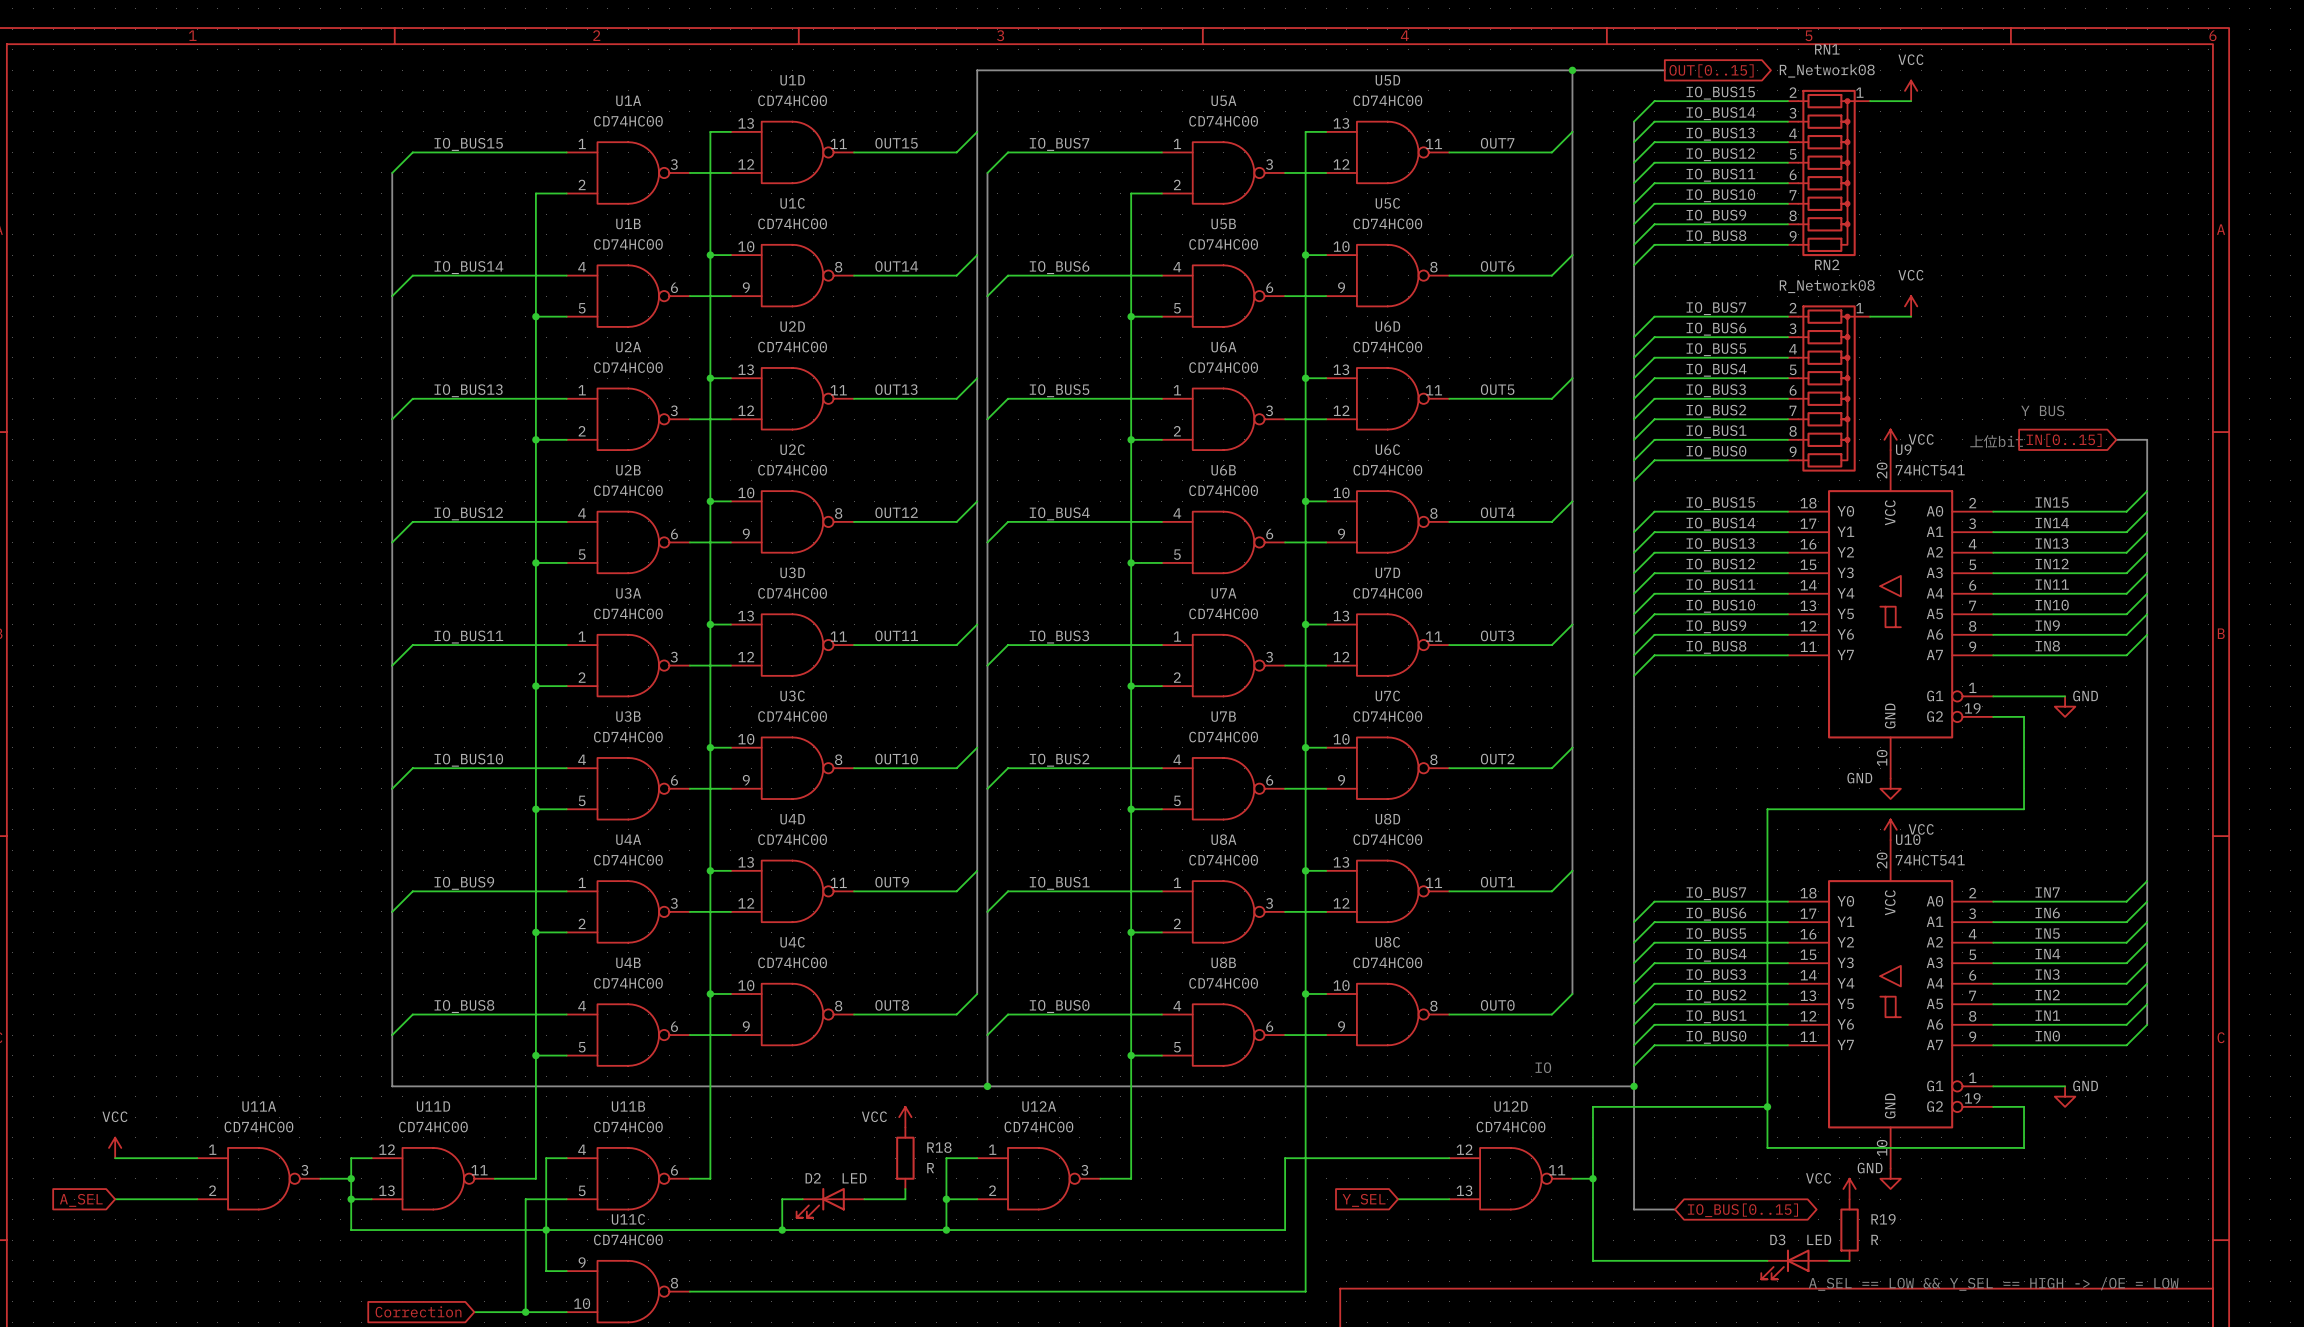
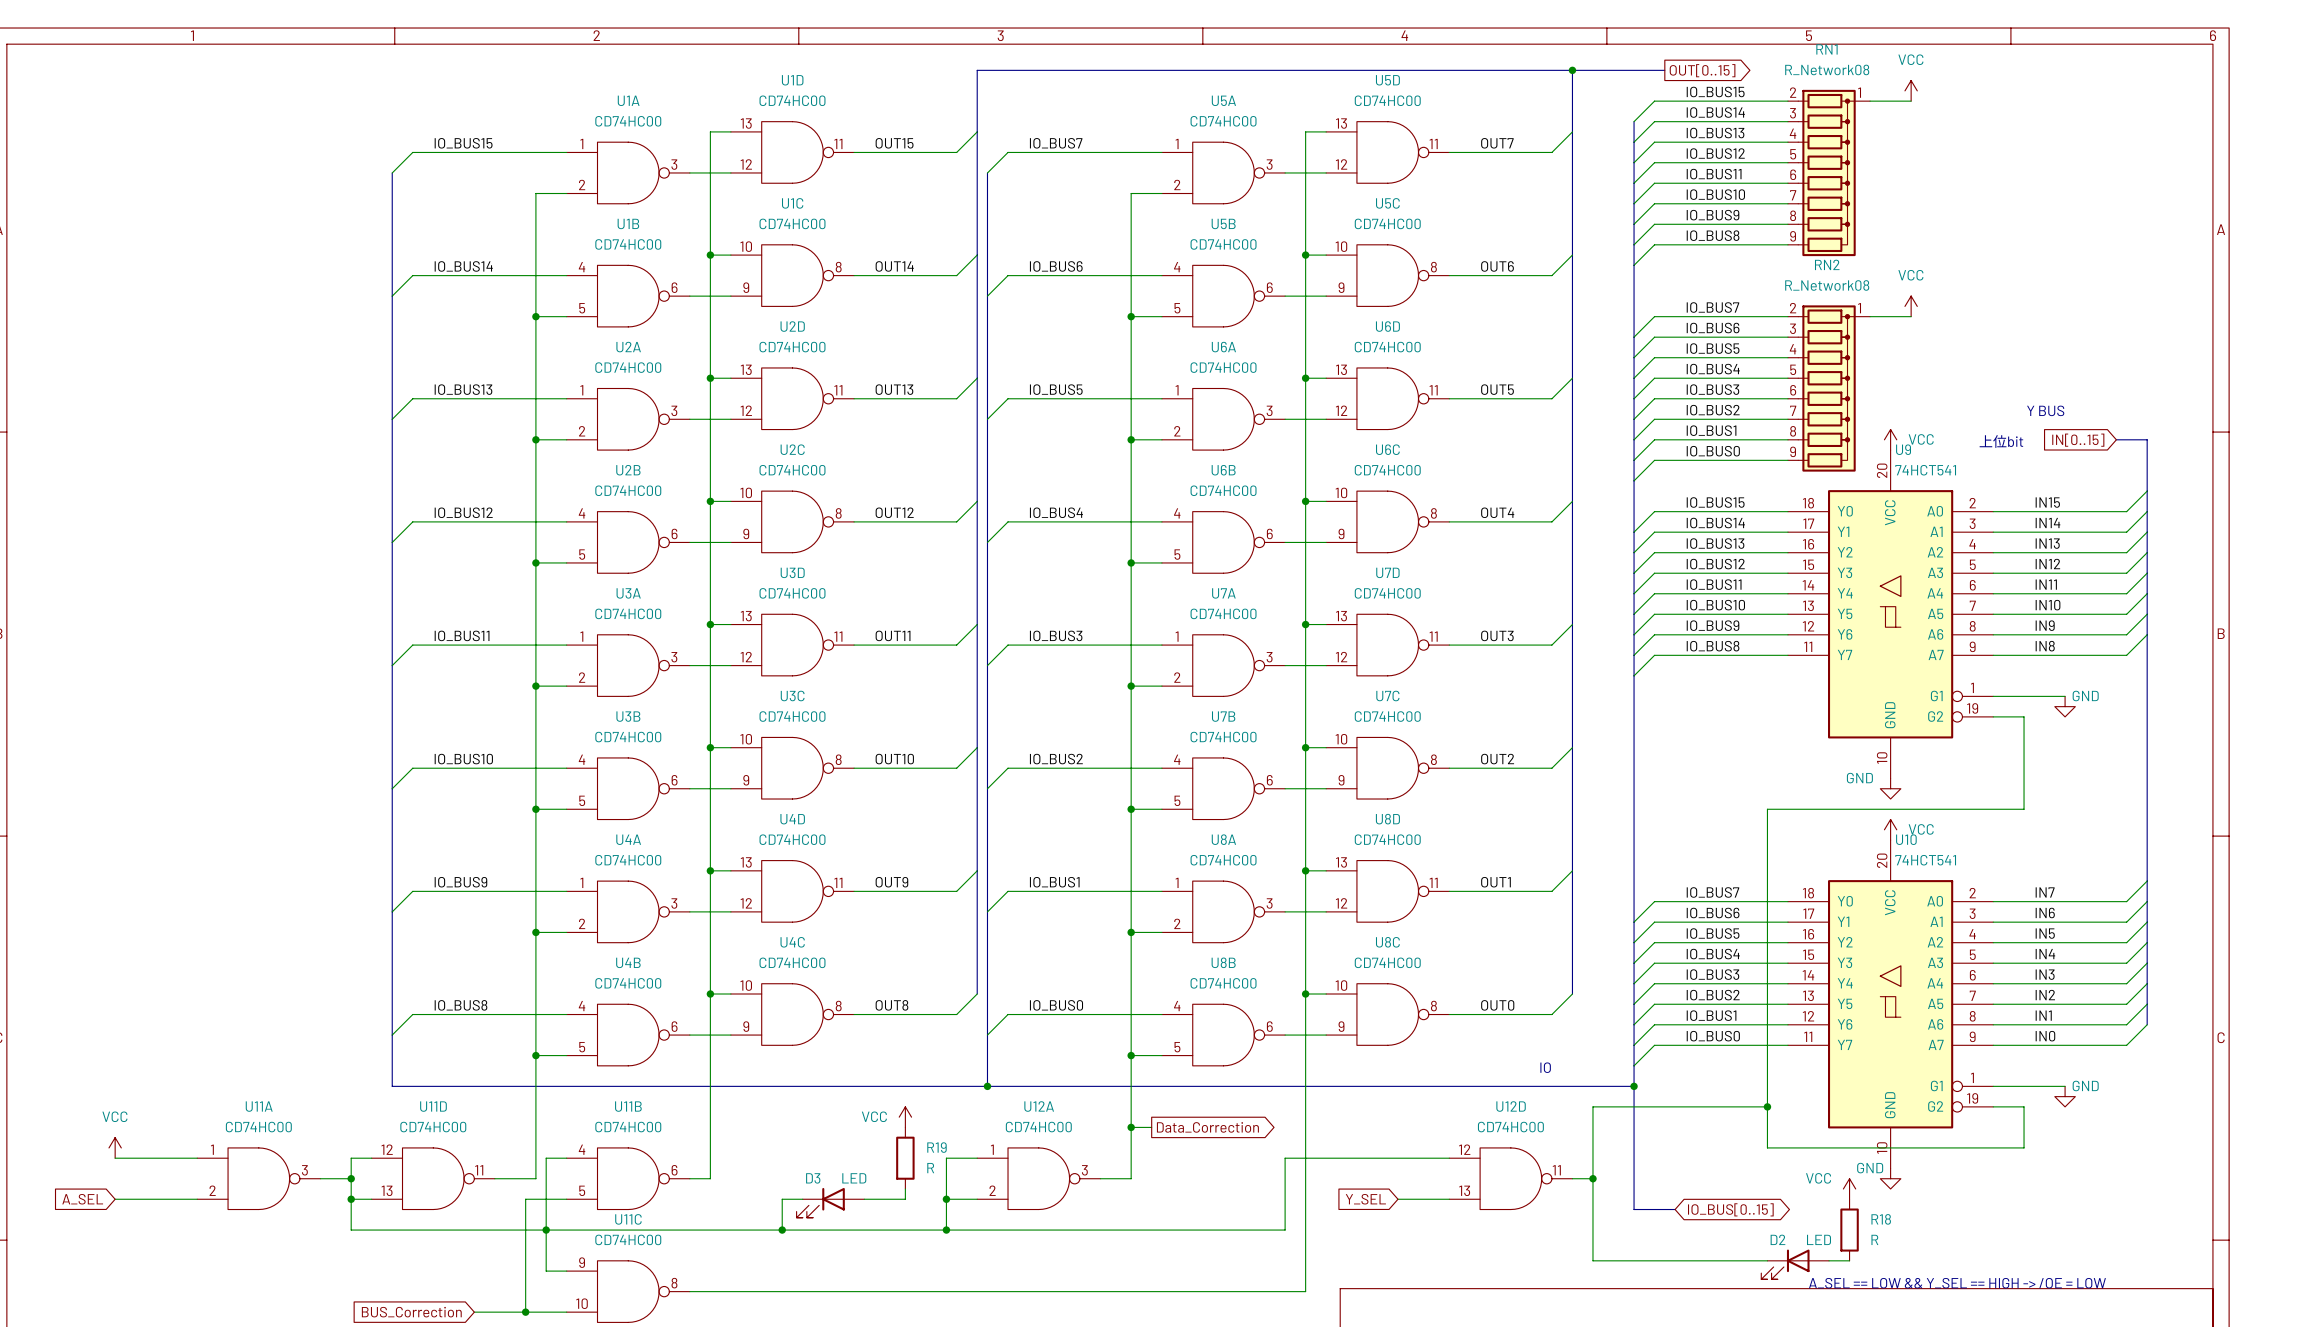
wire: none -> (1131, 1127) (1151, 1127)
junction: none -> (1131, 1127)
global label: none -> Data_Correction (1207, 1127)
R18 name: R18 (939, 1147) -> R19 (936, 1147)
D2 name: D2 (813, 1178) -> D3 (813, 1178)
R19 name: R19 (1883, 1219) -> R18 (1881, 1219)
D3 name: D3 (1777, 1239) -> D2 (1777, 1239)
global label: Correction (418, 1311) -> BUS_Correction (411, 1312)

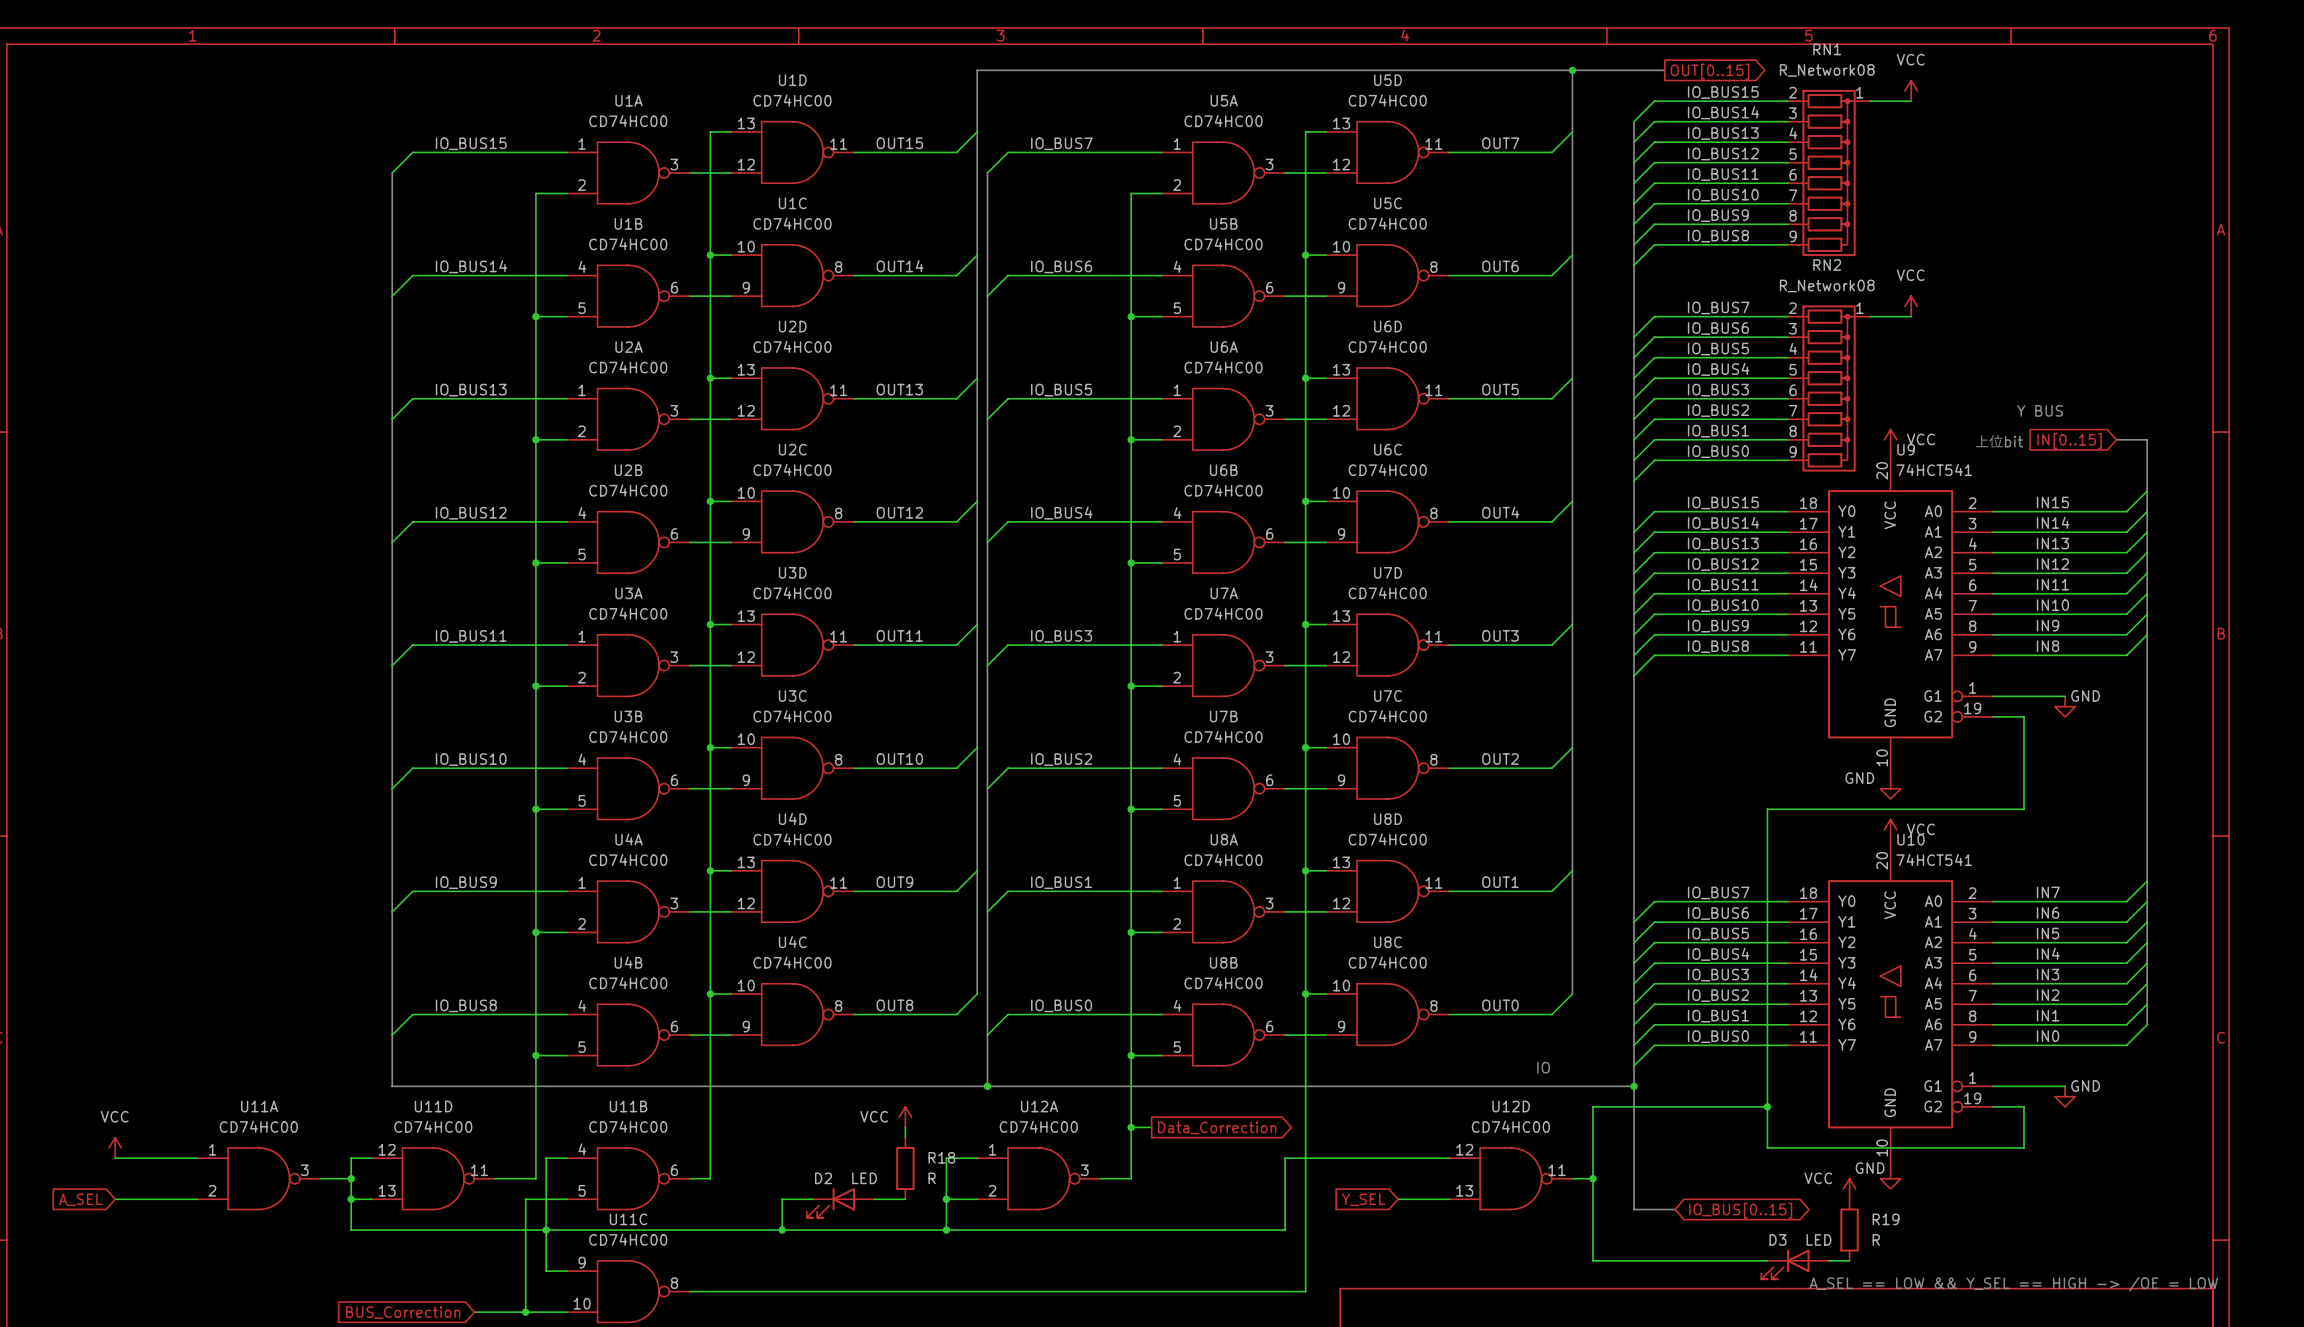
R19: R (905, 1158) -> none
R18: none -> R (905, 1168)
D3: LED (830, 1202) -> none
D2: none -> LED (840, 1202)
R18 name: R18 (1881, 1219) -> R19 (1886, 1219)
D2 name: D2 (1777, 1239) -> D3 (1777, 1239)

